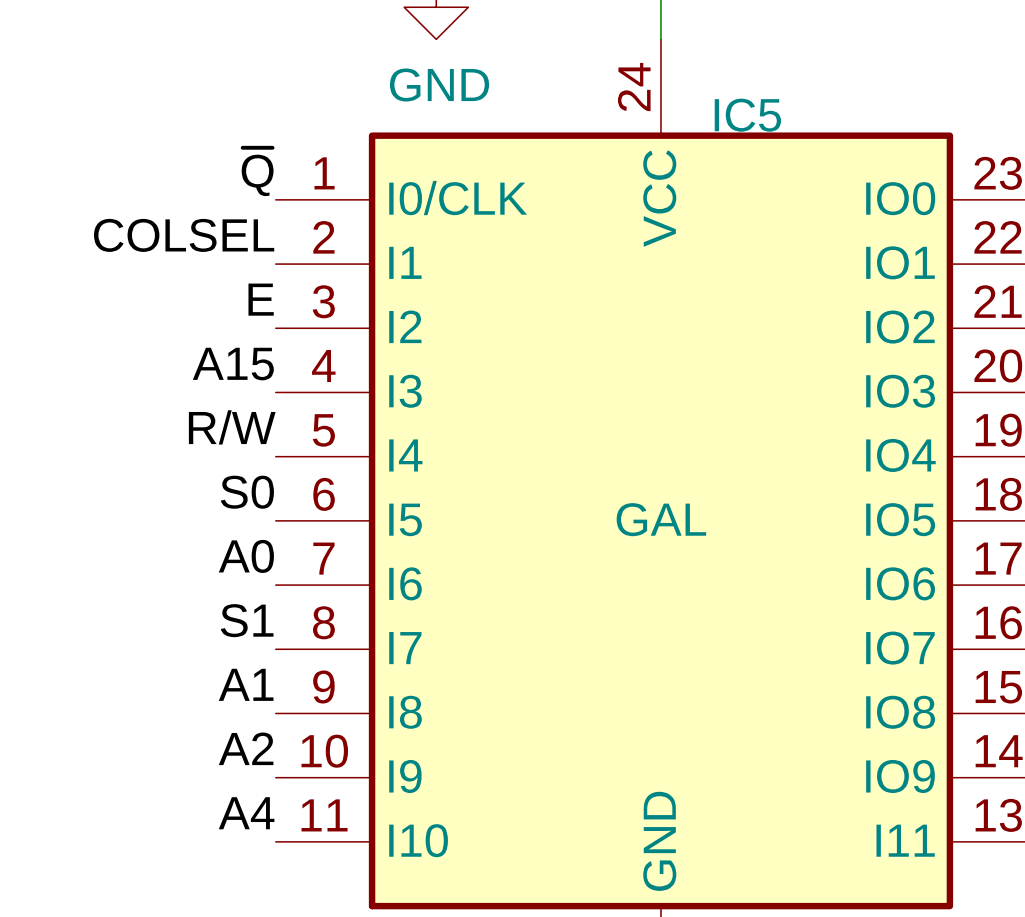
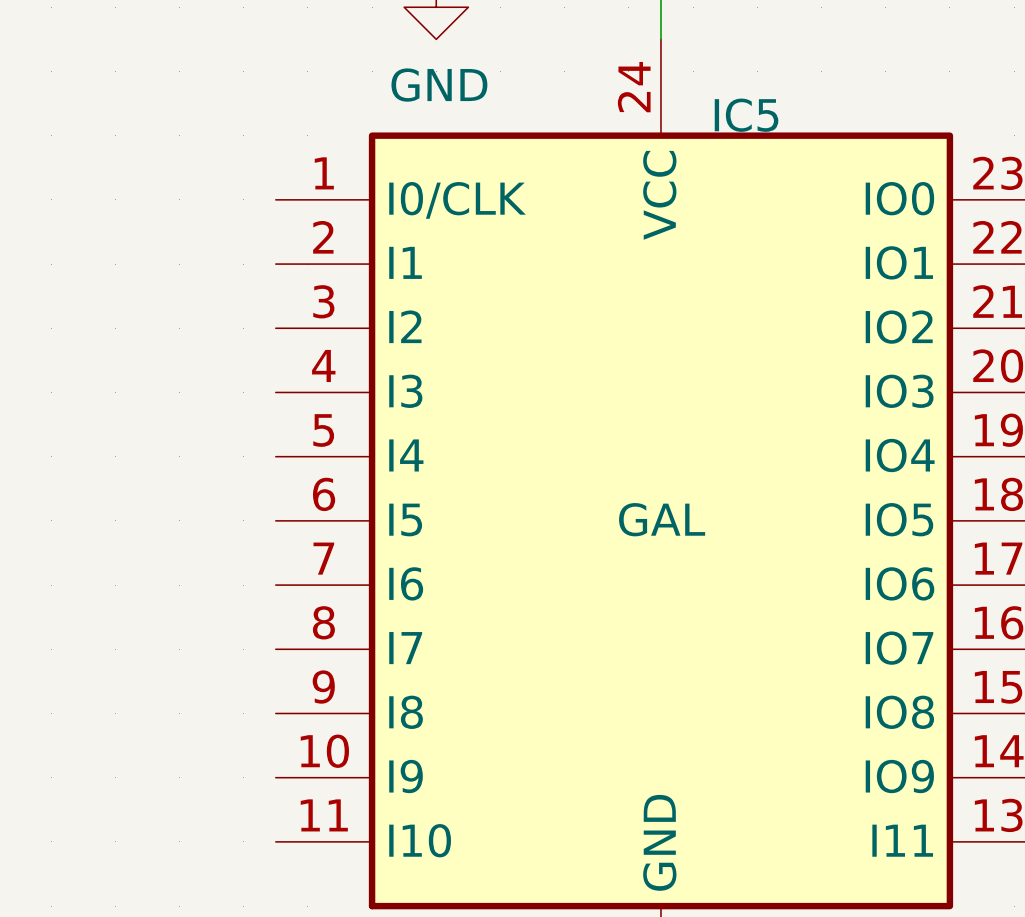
label: ~{Q} (257, 171) -> none
label: COLSEL (184, 235) -> none
label: E (261, 299) -> none
label: A15 (233, 364) -> none
label: R/W (232, 427) -> none
label: S0 (247, 492) -> none
label: A0 (246, 556) -> none
label: S1 (247, 620) -> none
label: A1 (246, 684) -> none
label: A2 (246, 748) -> none
label: A4 (246, 813) -> none

